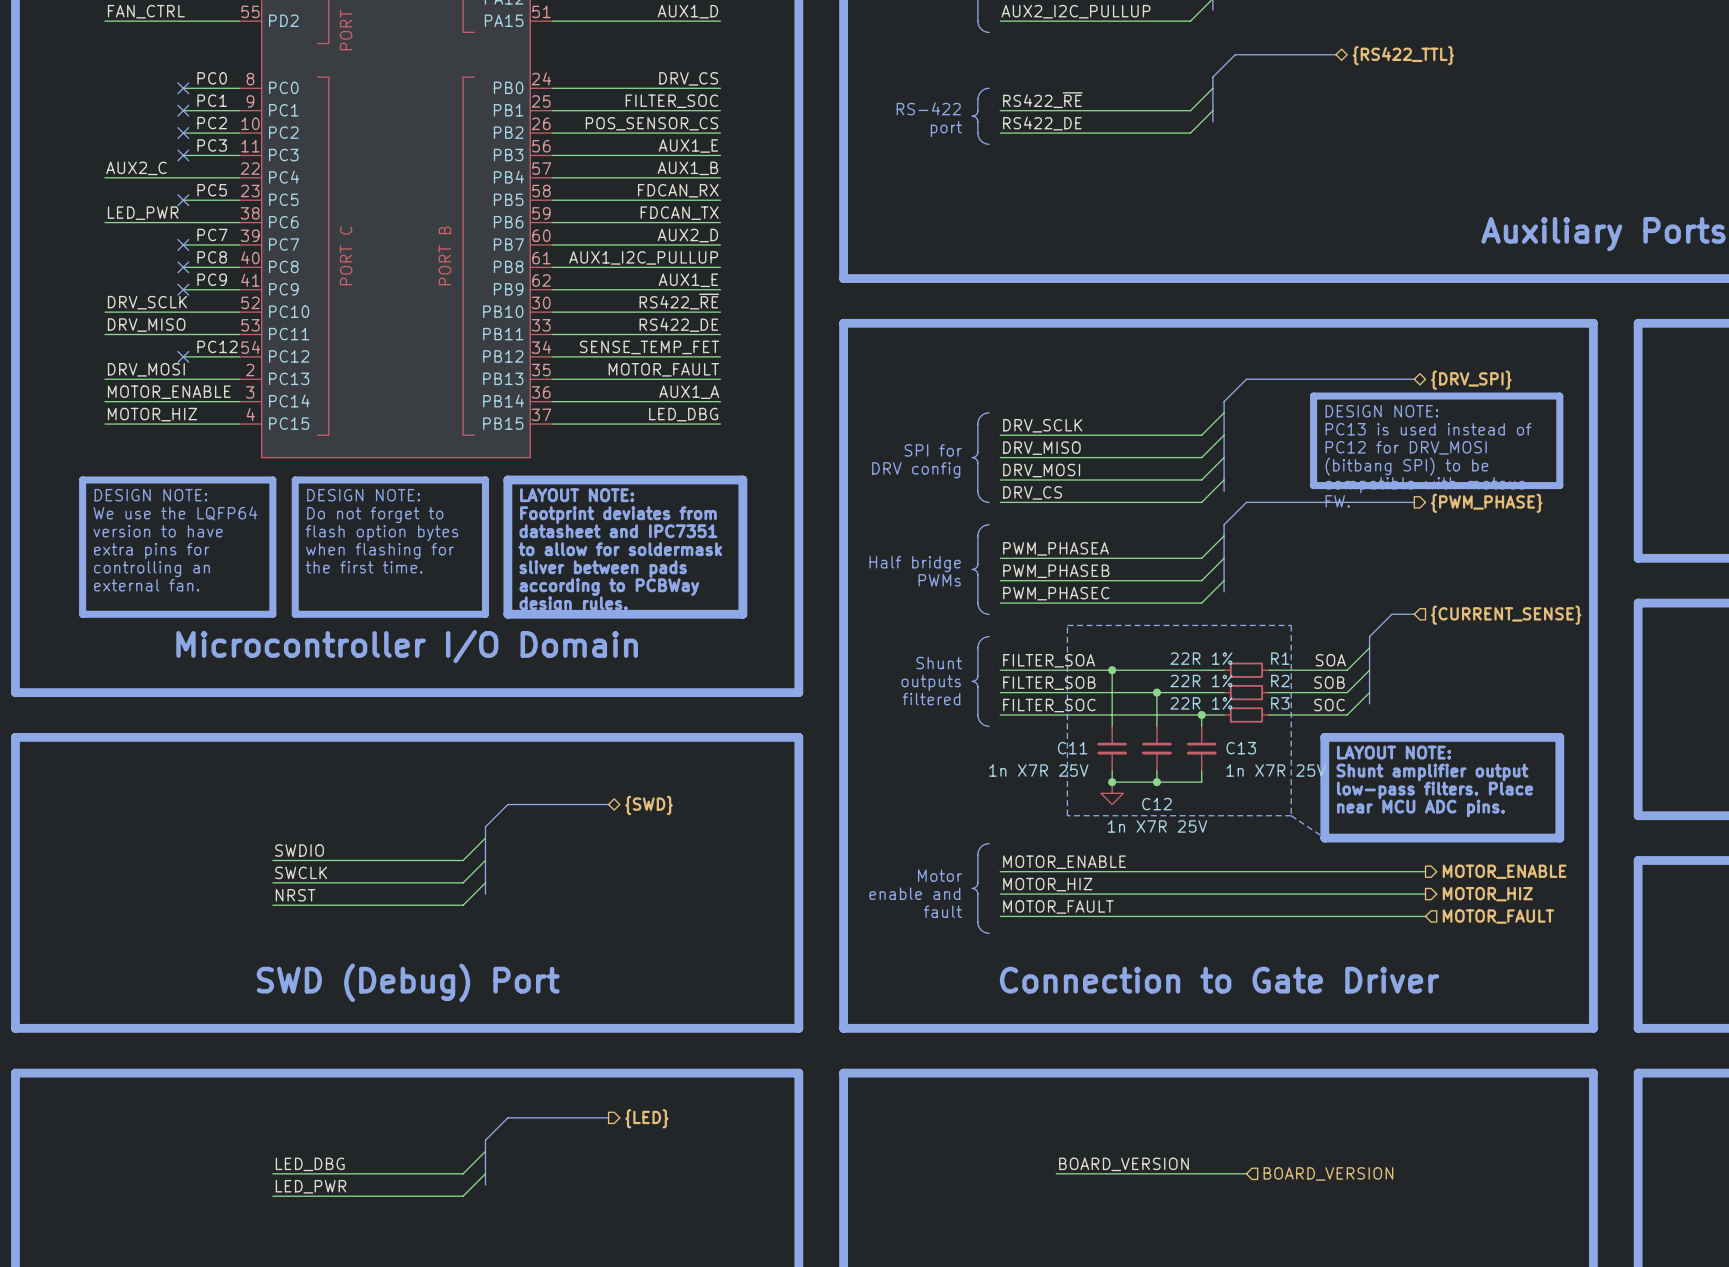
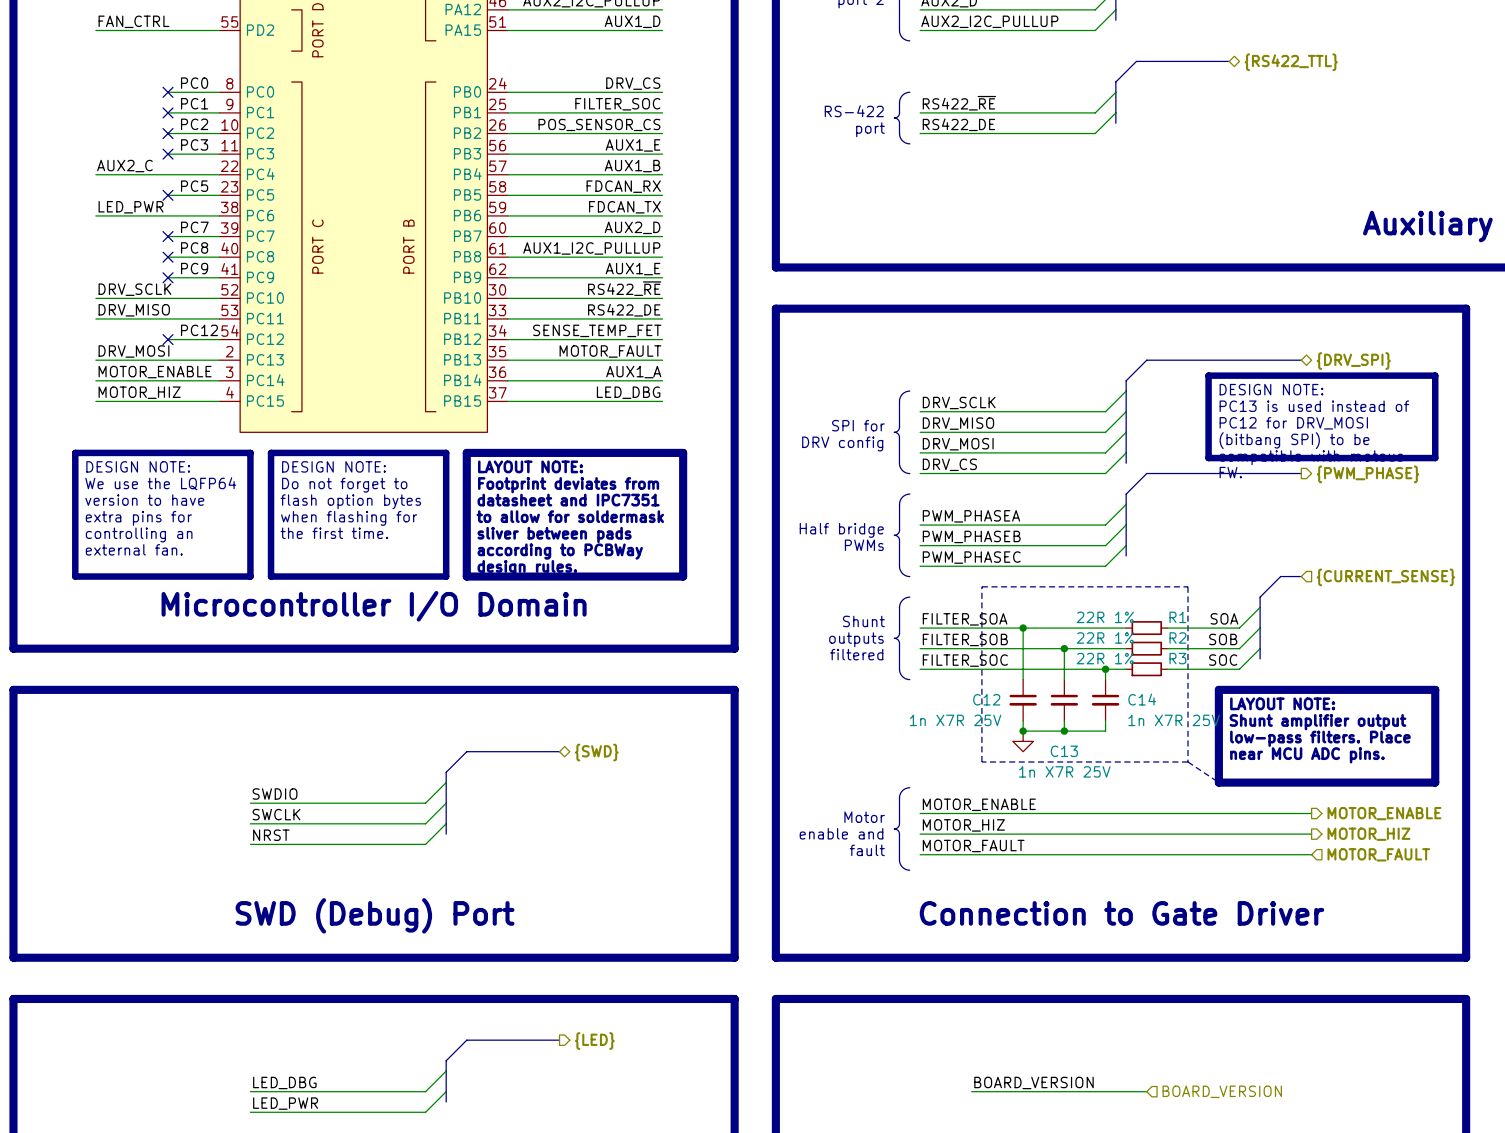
C11 name: C11 (1072, 748) -> C12 (986, 699)
C13 name: C13 (1241, 748) -> C14 (1142, 699)
C12 name: C12 (1156, 804) -> C13 (1064, 751)

